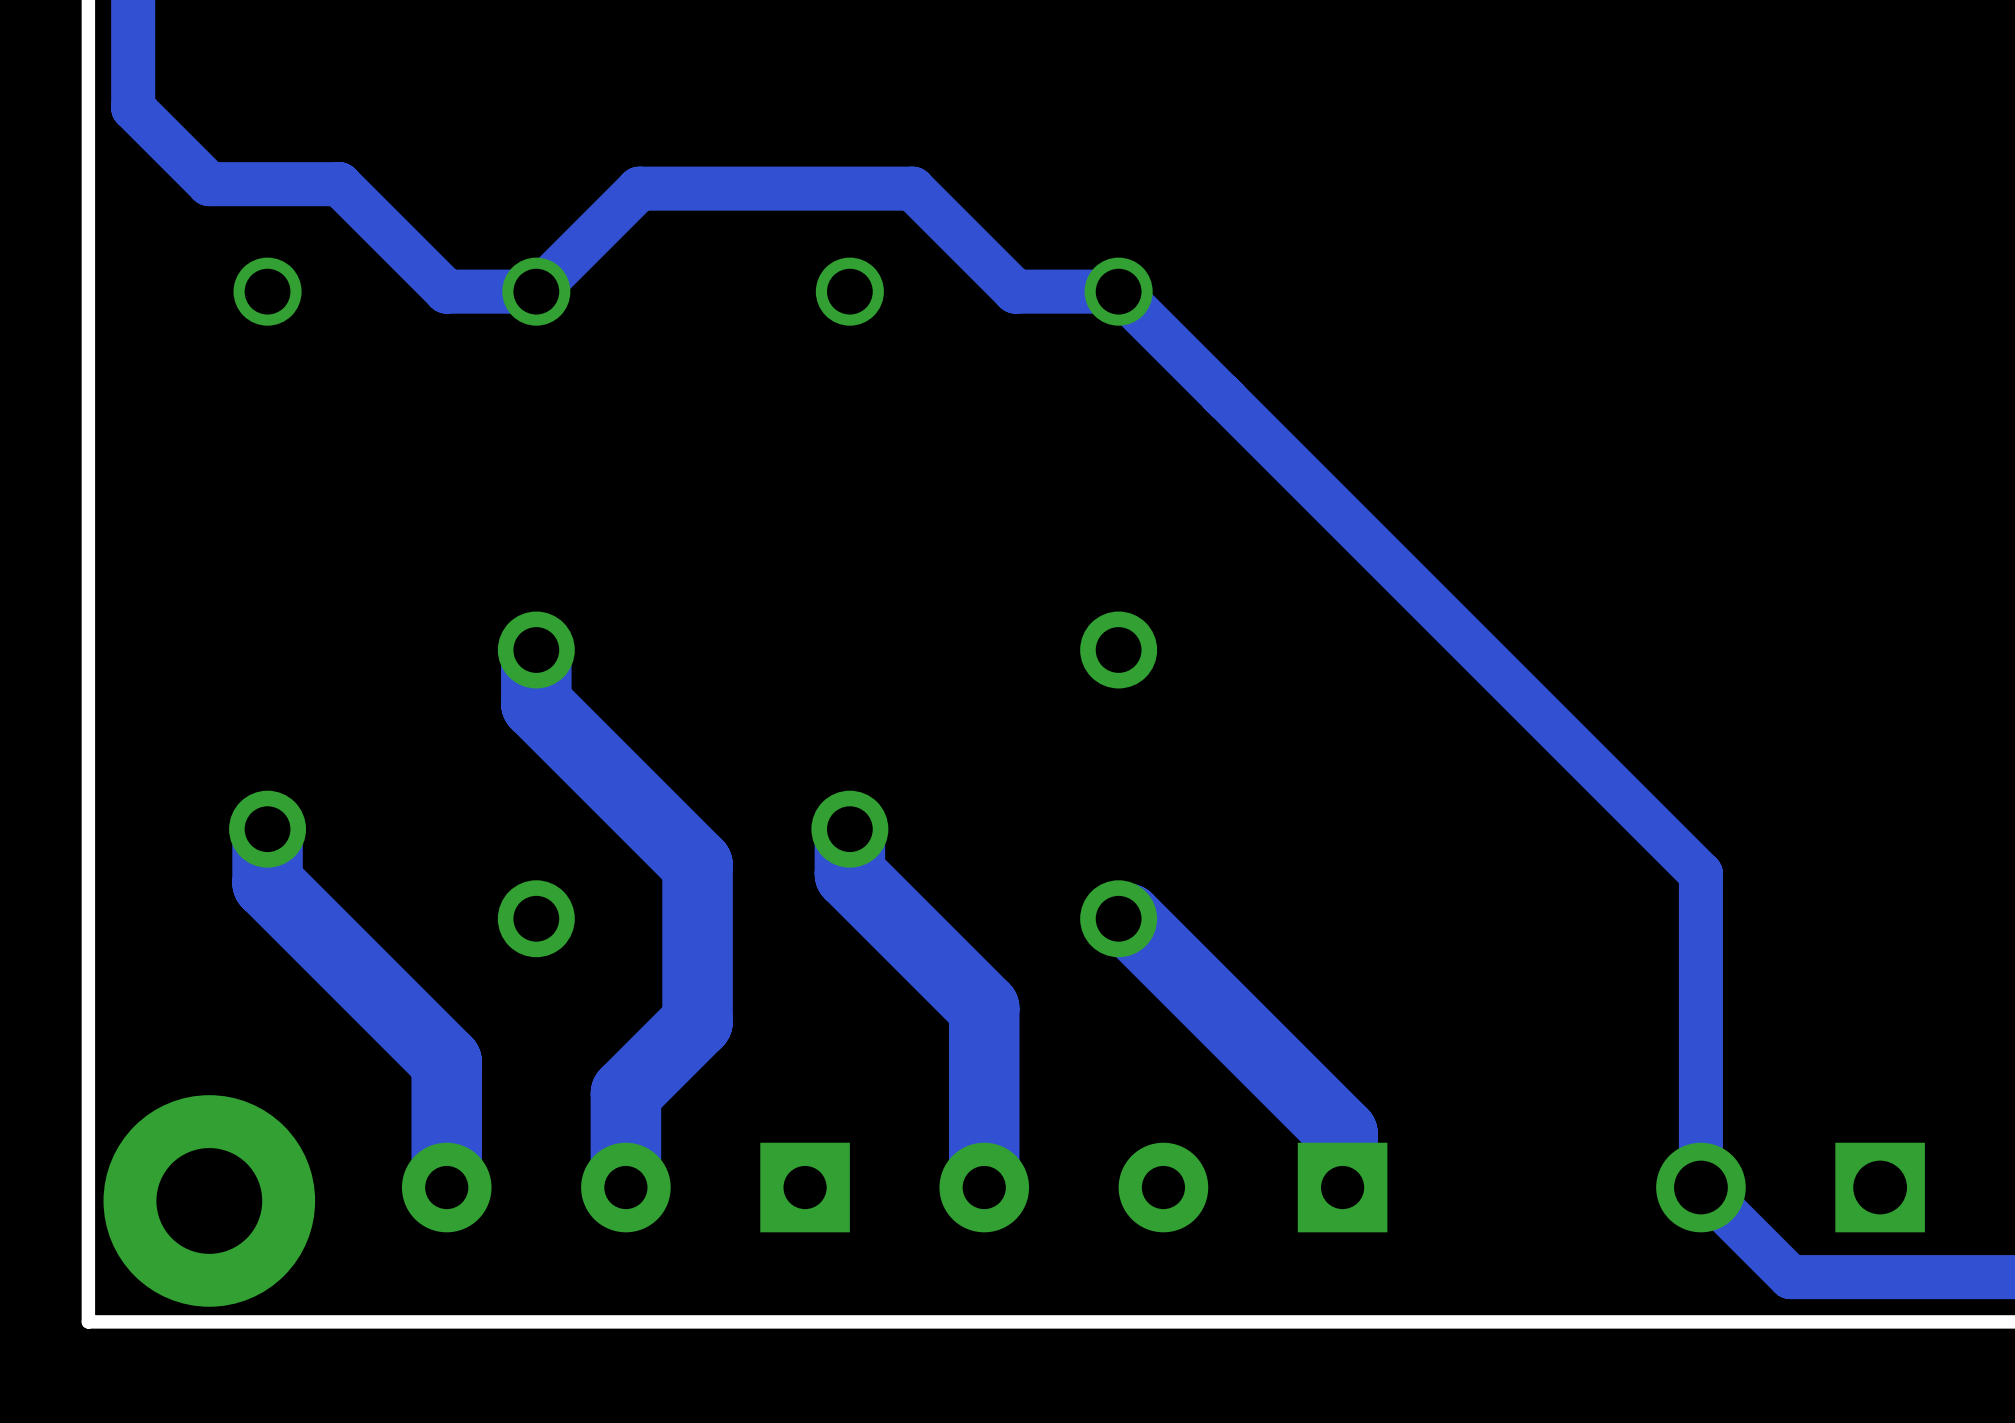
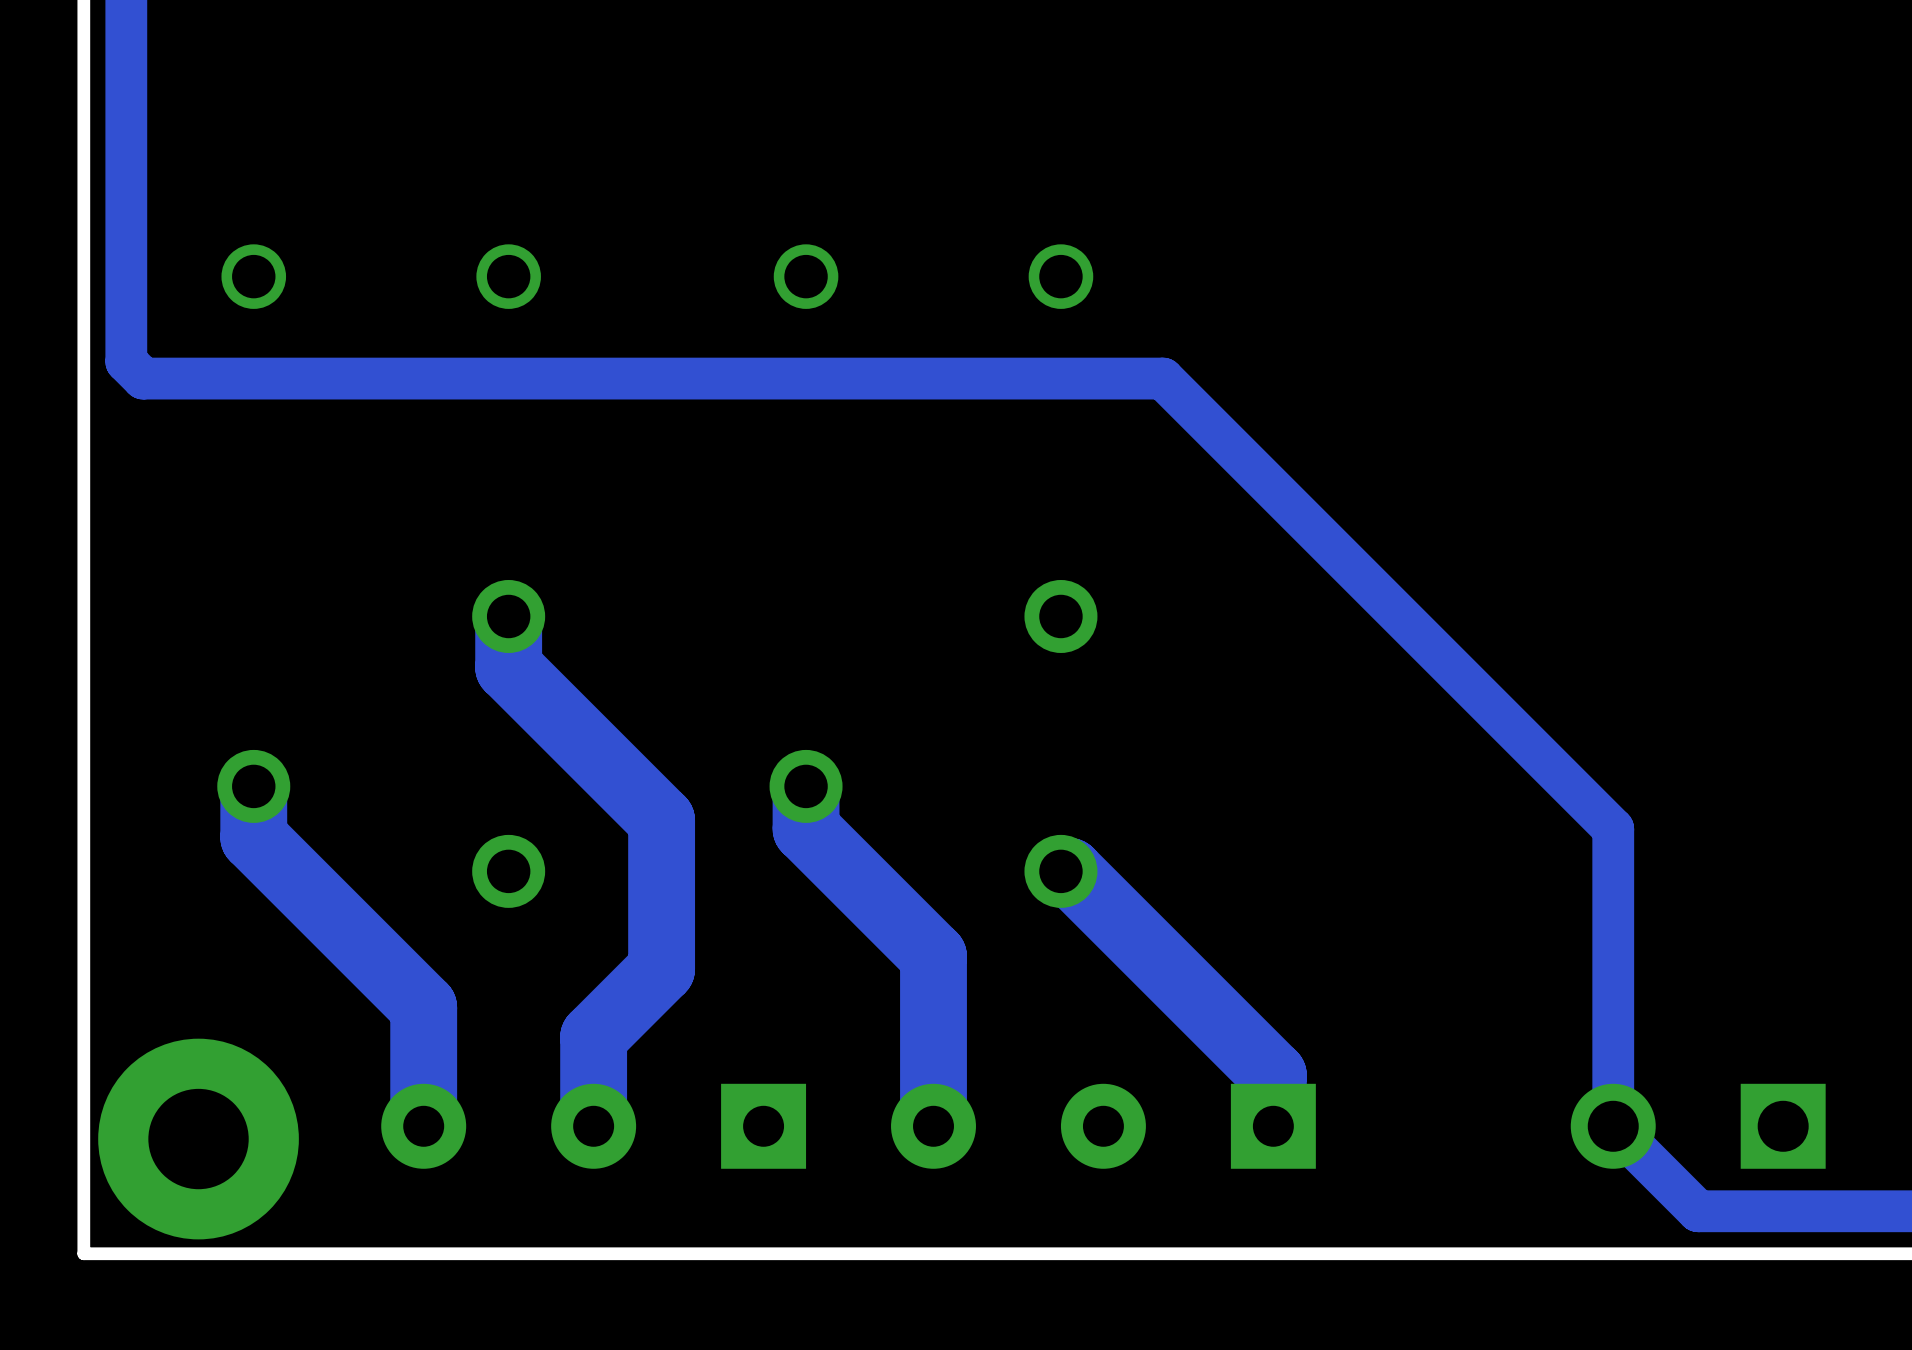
track: (133, 108) (209, 184) (339, 184) (446, 291) (536, 291) (639, 188) (912, 188) (1015, 291) (1118, 291) (1226, 399) -> (126, 102) (126, 361) (143, 378) (1162, 378)

